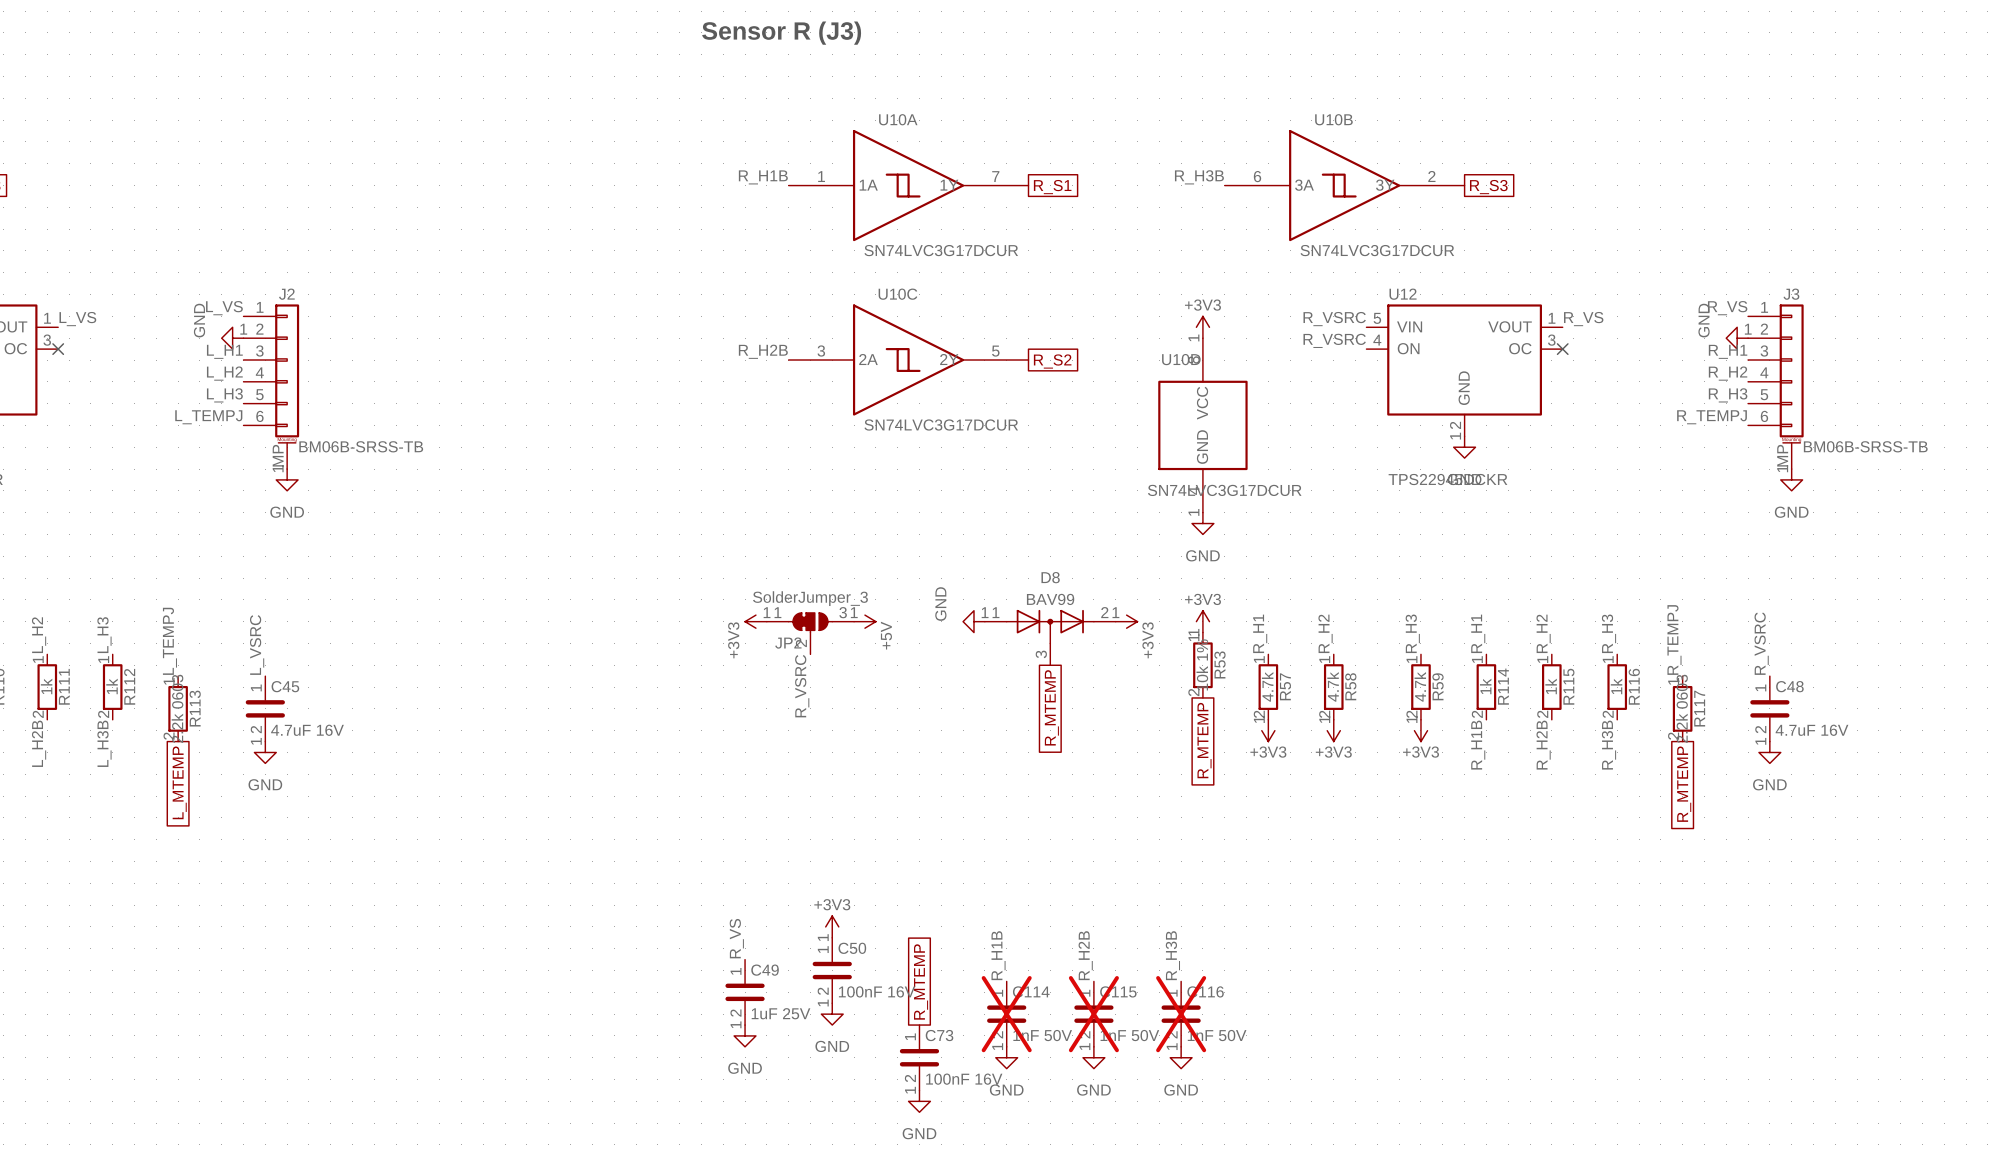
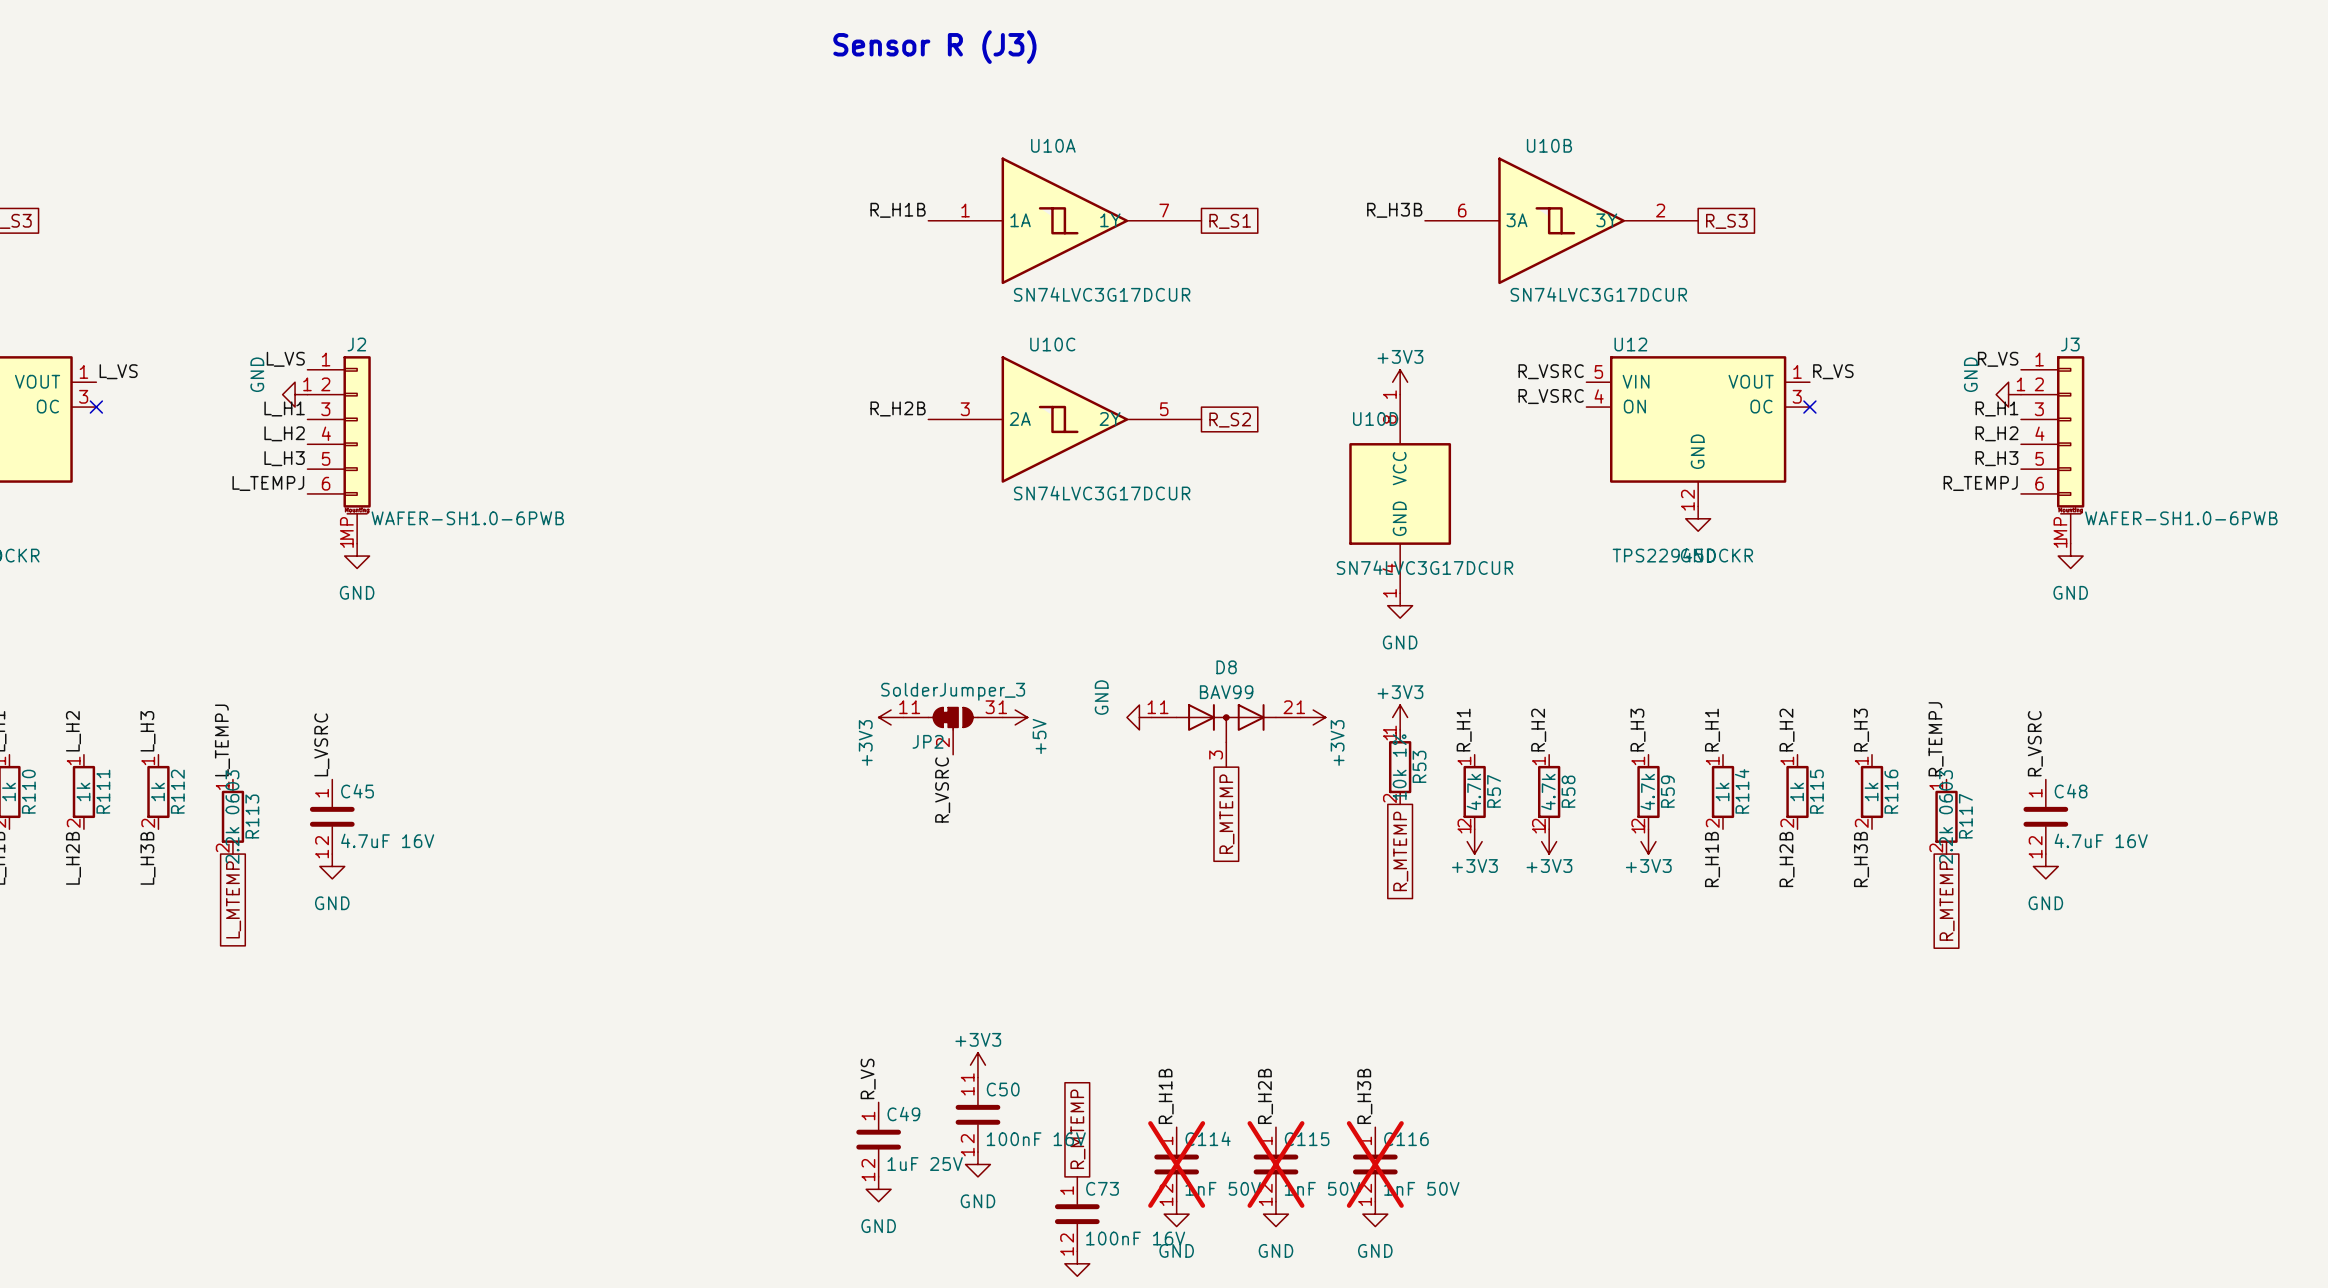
J2 value: BM06B-SRSS-TB (361, 446) -> WAFER-SH1.0-6PWB (467, 518)
J3 value: BM06B-SRSS-TB (1865, 446) -> WAFER-SH1.0-6PWB (2181, 518)

